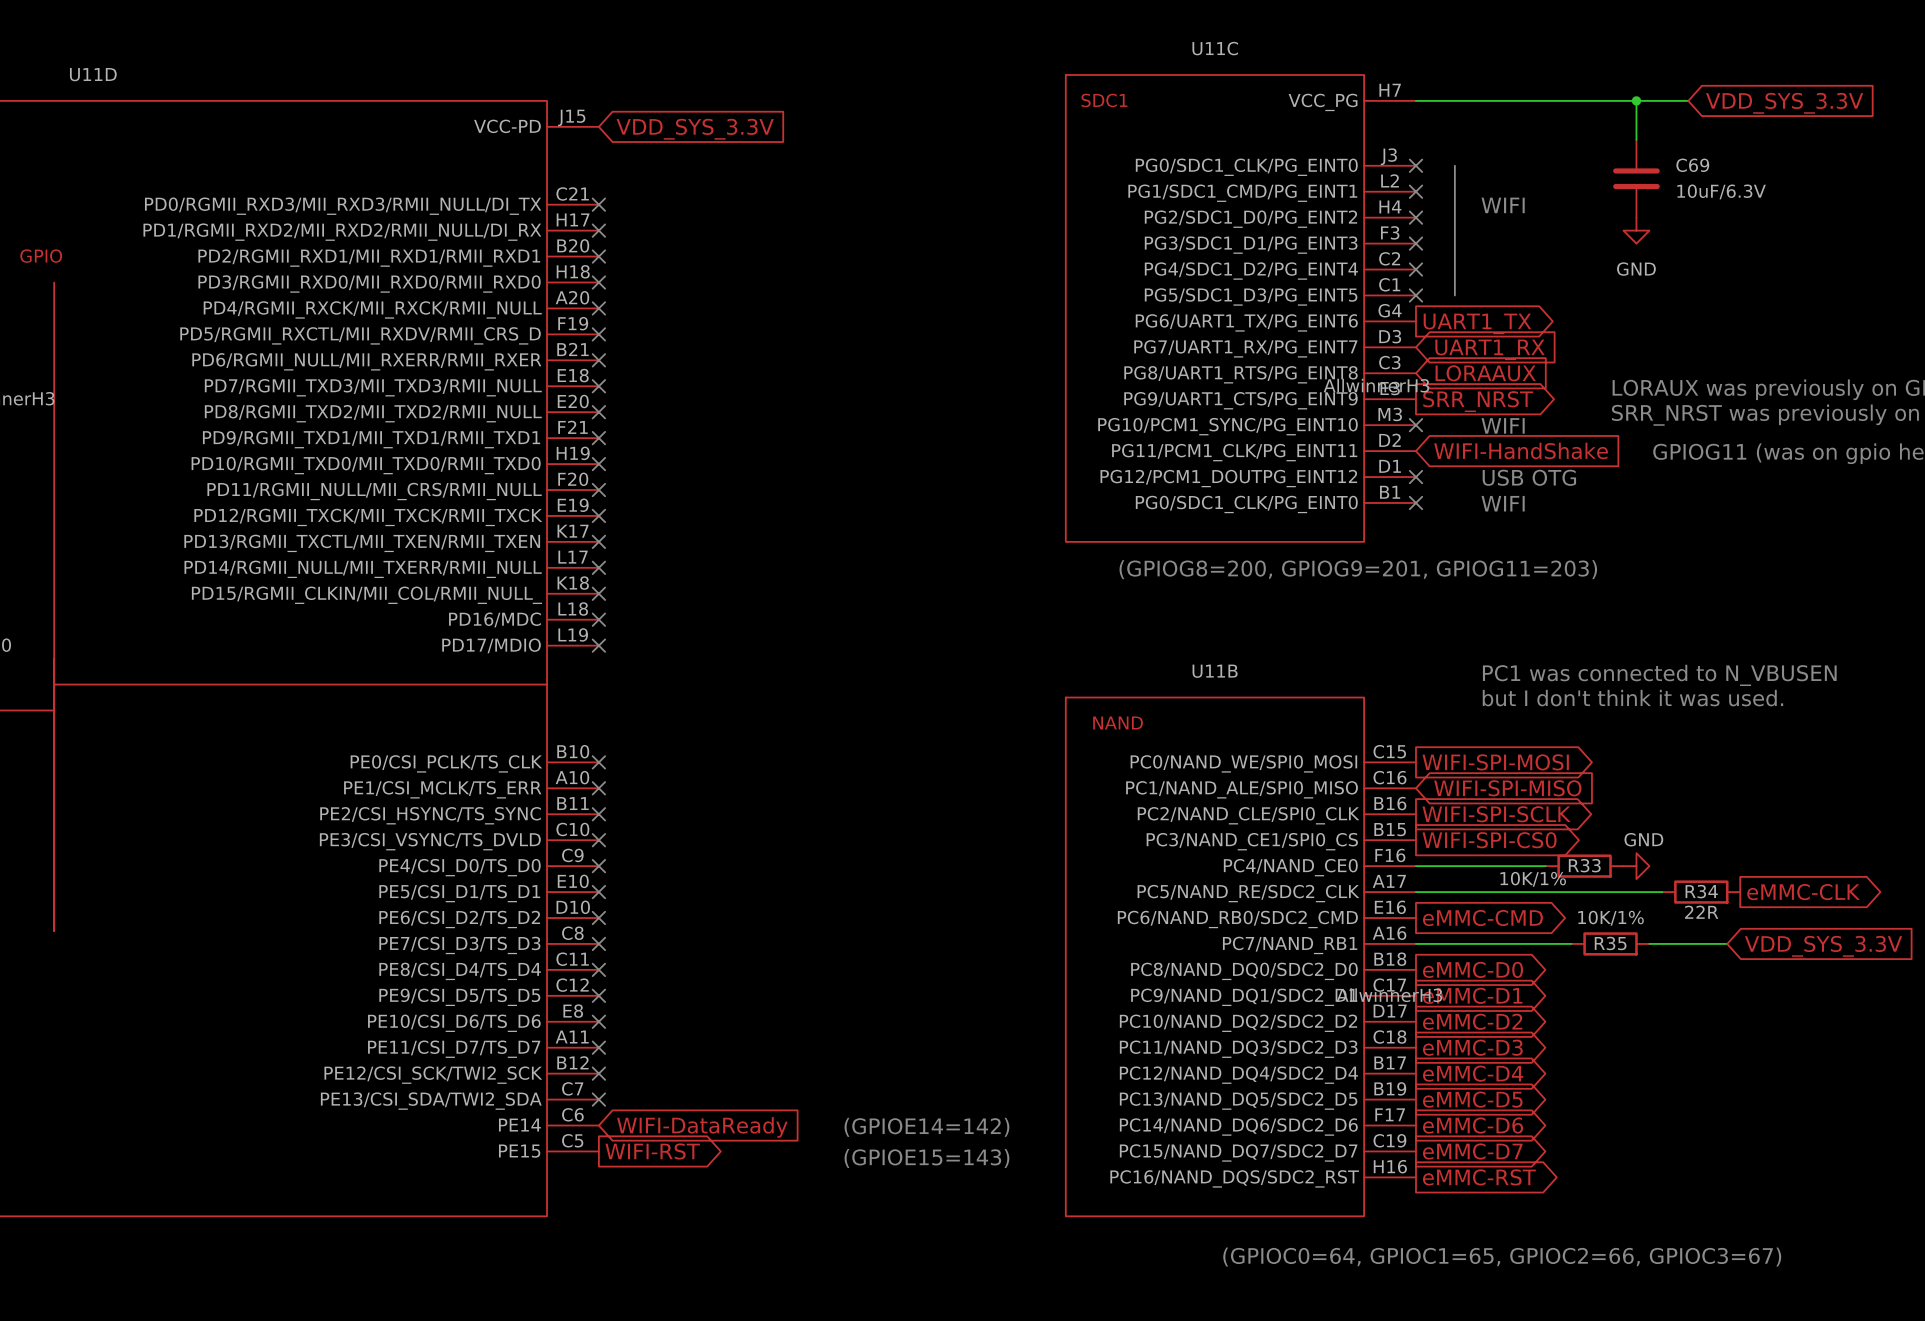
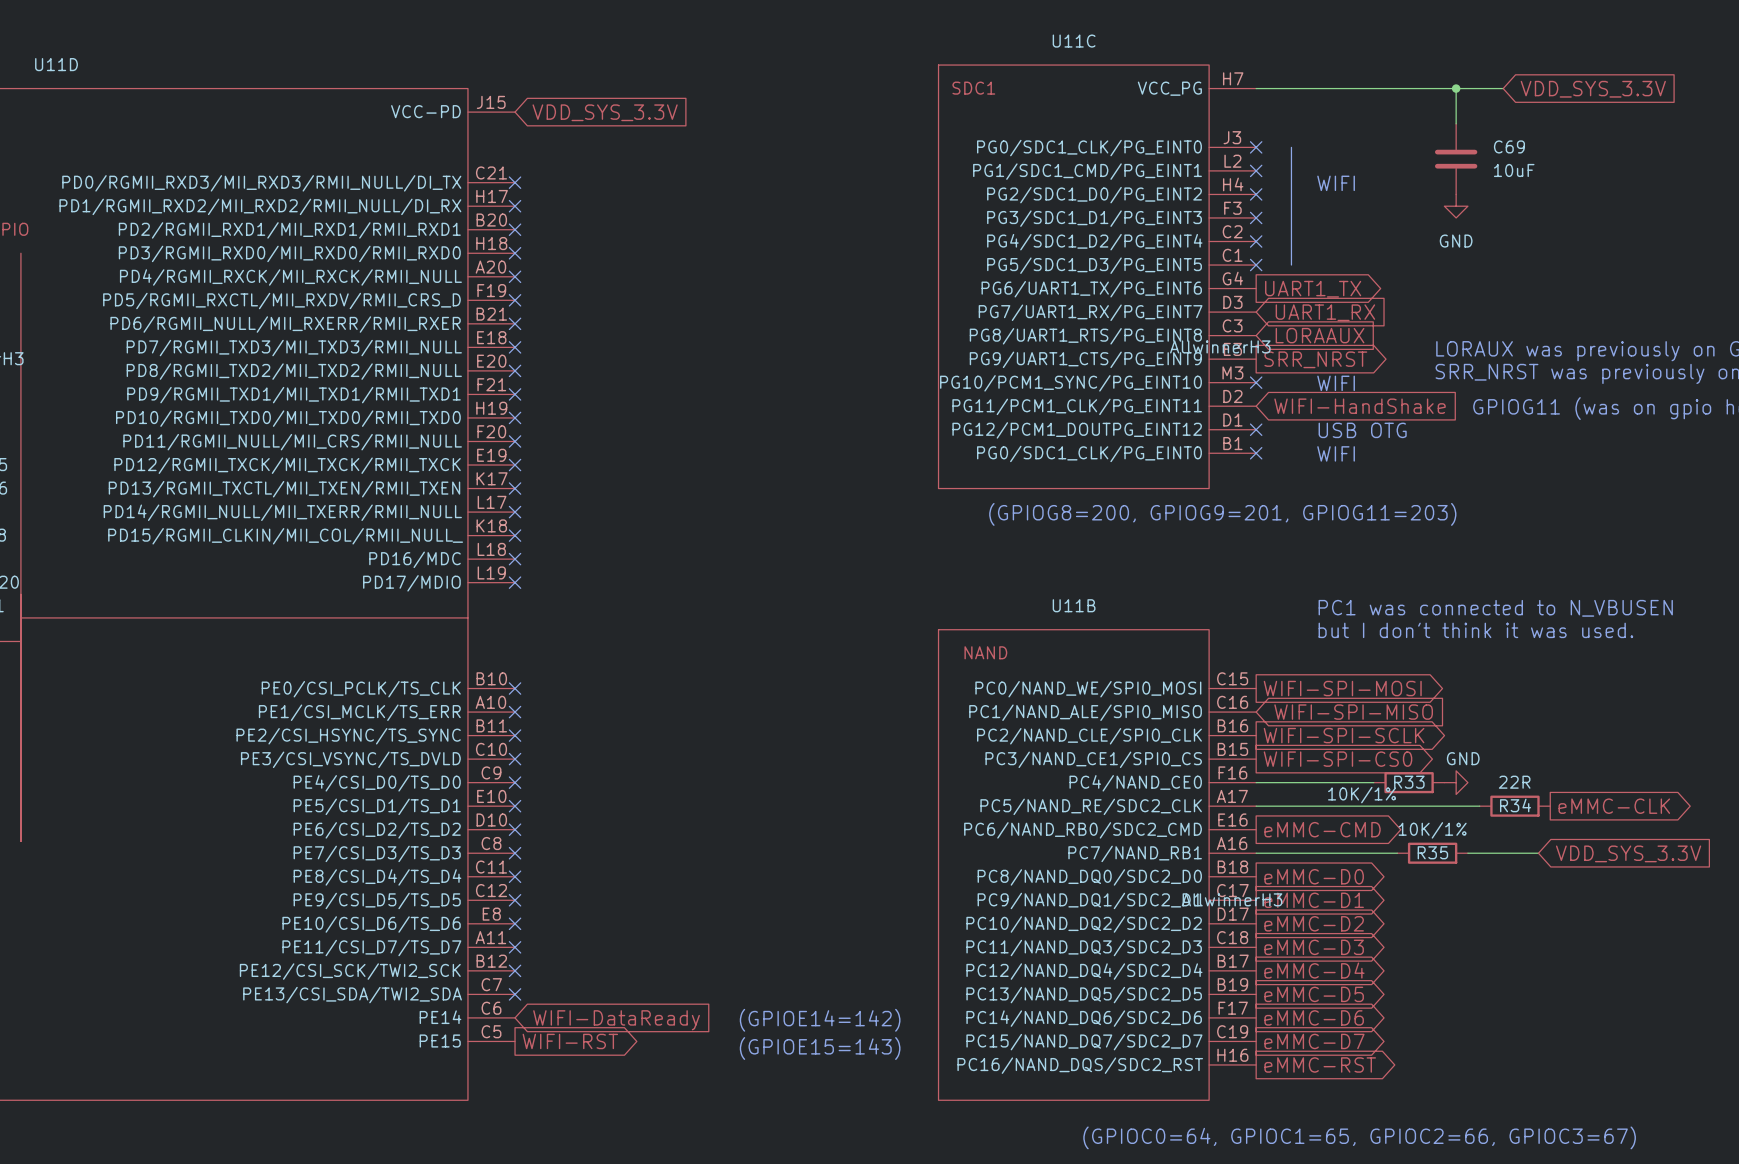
C69 value: 10uF/6.3V (1721, 191) -> 10uF (1514, 170)
R34 value position: 22R (1701, 912) -> 22R (1514, 782)

